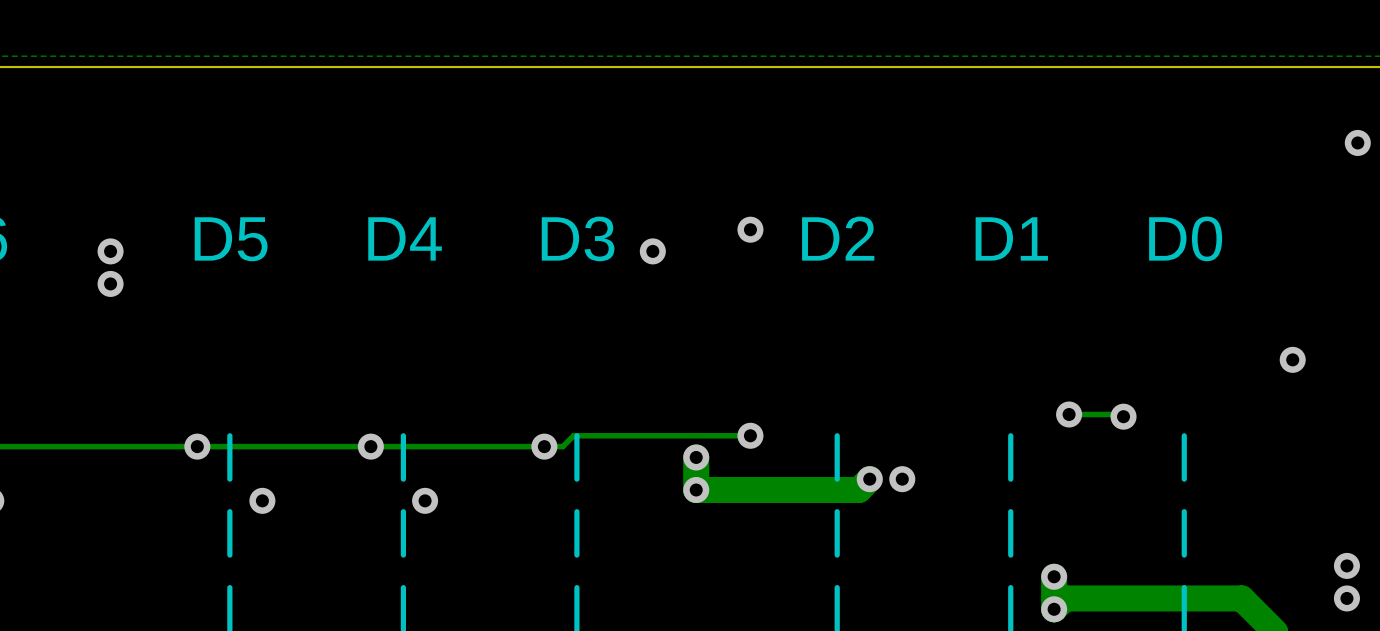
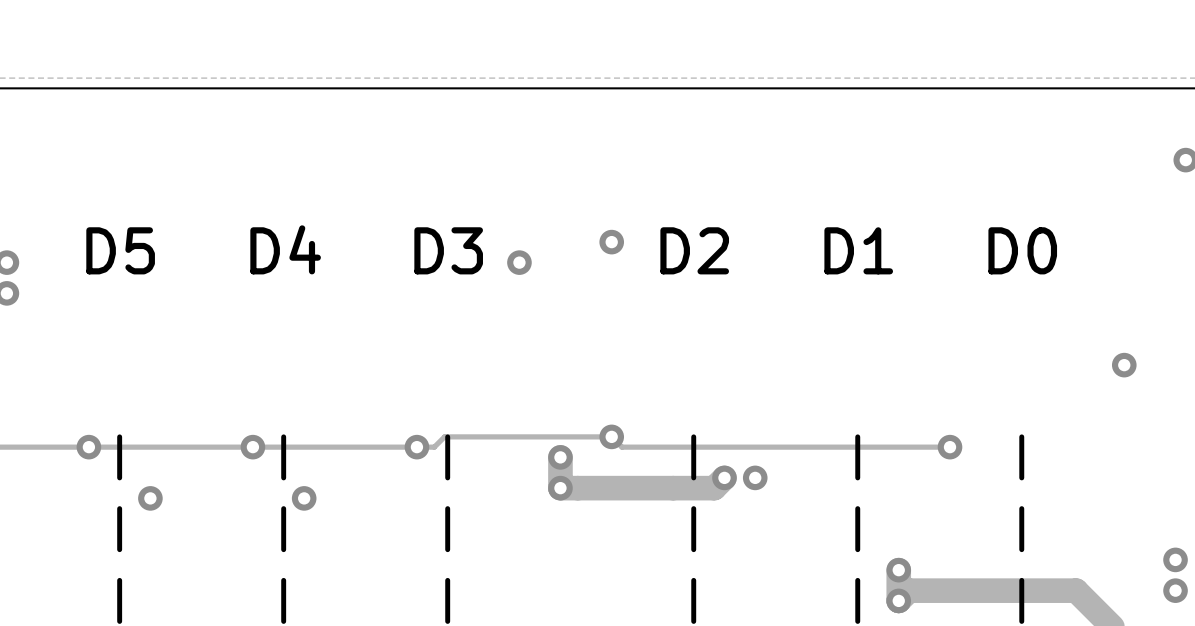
track: (1069, 414) (1121, 414) (1123, 416) -> none
via: (1069, 414) -> none
via: (1123, 416) -> none
track: none -> (611, 436) (621, 447) (950, 447)
via: none -> (950, 447)

